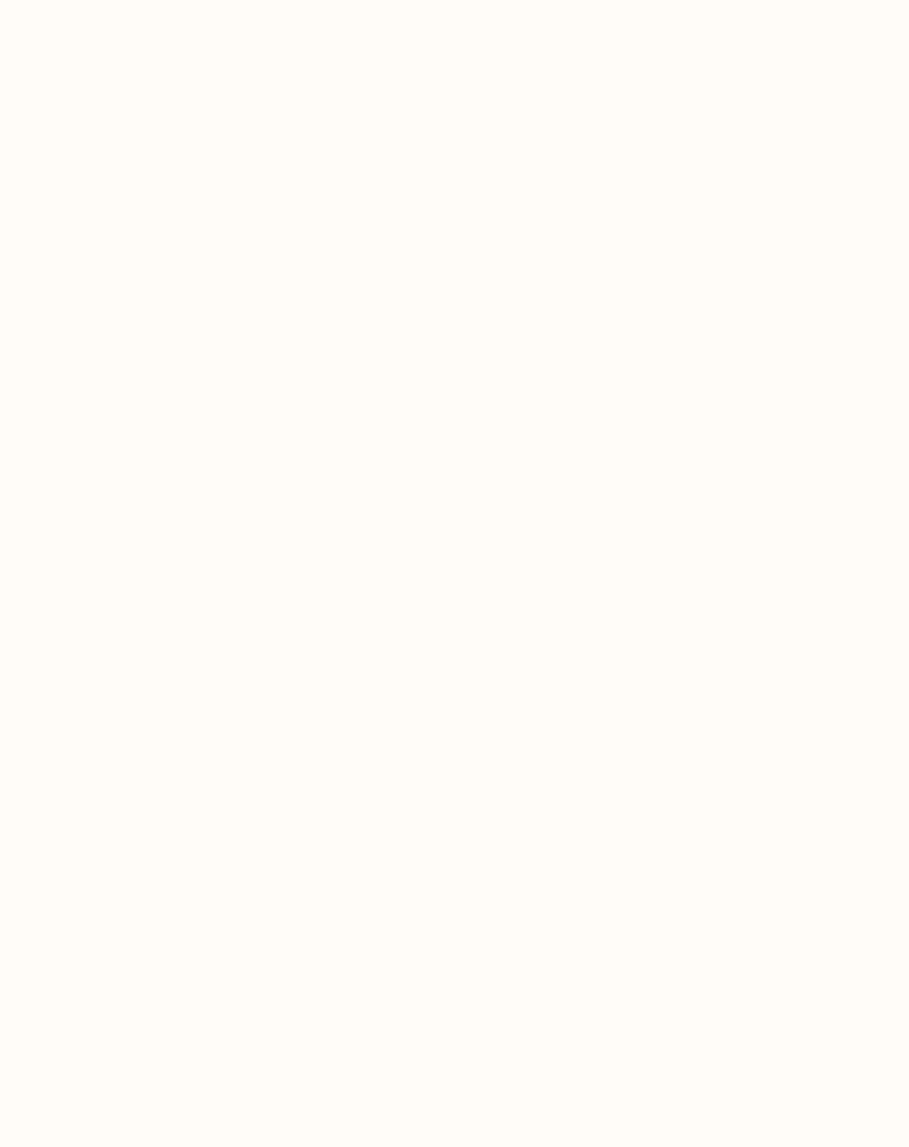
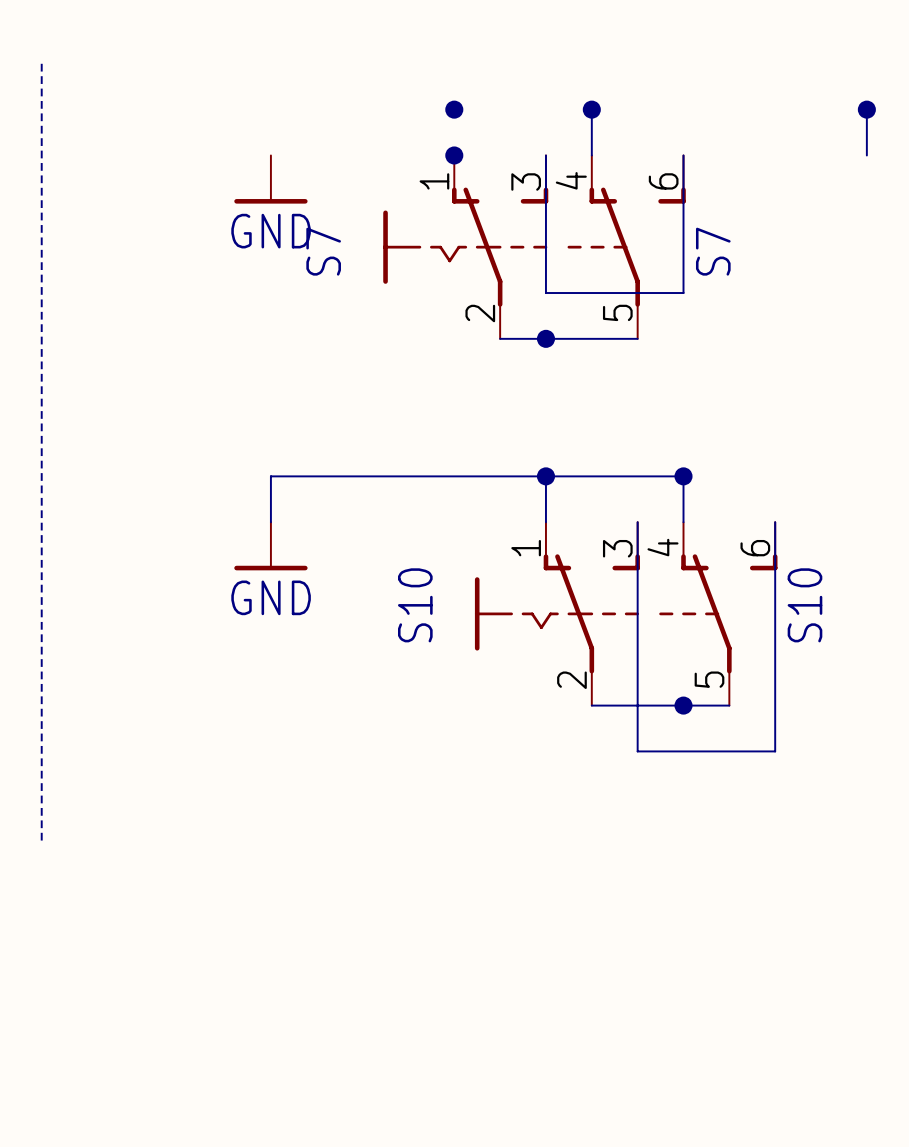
wire: none -> (41, 63) (41, 843)
junction: none -> (454, 109)
wire: none -> (591, 109) (591, 155)
junction: none -> (591, 109)
wire: none -> (866, 109) (866, 155)
junction: none -> (866, 109)
junction: none -> (454, 155)
wire: none -> (545, 155) (545, 293) (683, 293) (683, 155)
power symbol: none -> GND (270, 179)
S7: none -> (465, 247)
S7: none -> (626, 247)
wire: none -> (500, 338) (637, 338)
junction: none -> (545, 338)
wire: none -> (545, 476) (545, 522)
junction: none -> (545, 476)
junction: none -> (683, 476)
wire: none -> (270, 522) (270, 476) (683, 476) (683, 522)
wire: none -> (637, 522) (637, 751) (775, 751) (775, 522)
power symbol: none -> GND (270, 546)
S10: none -> (557, 613)
S10: none -> (718, 613)
wire: none -> (591, 705) (729, 705)
junction: none -> (683, 705)

